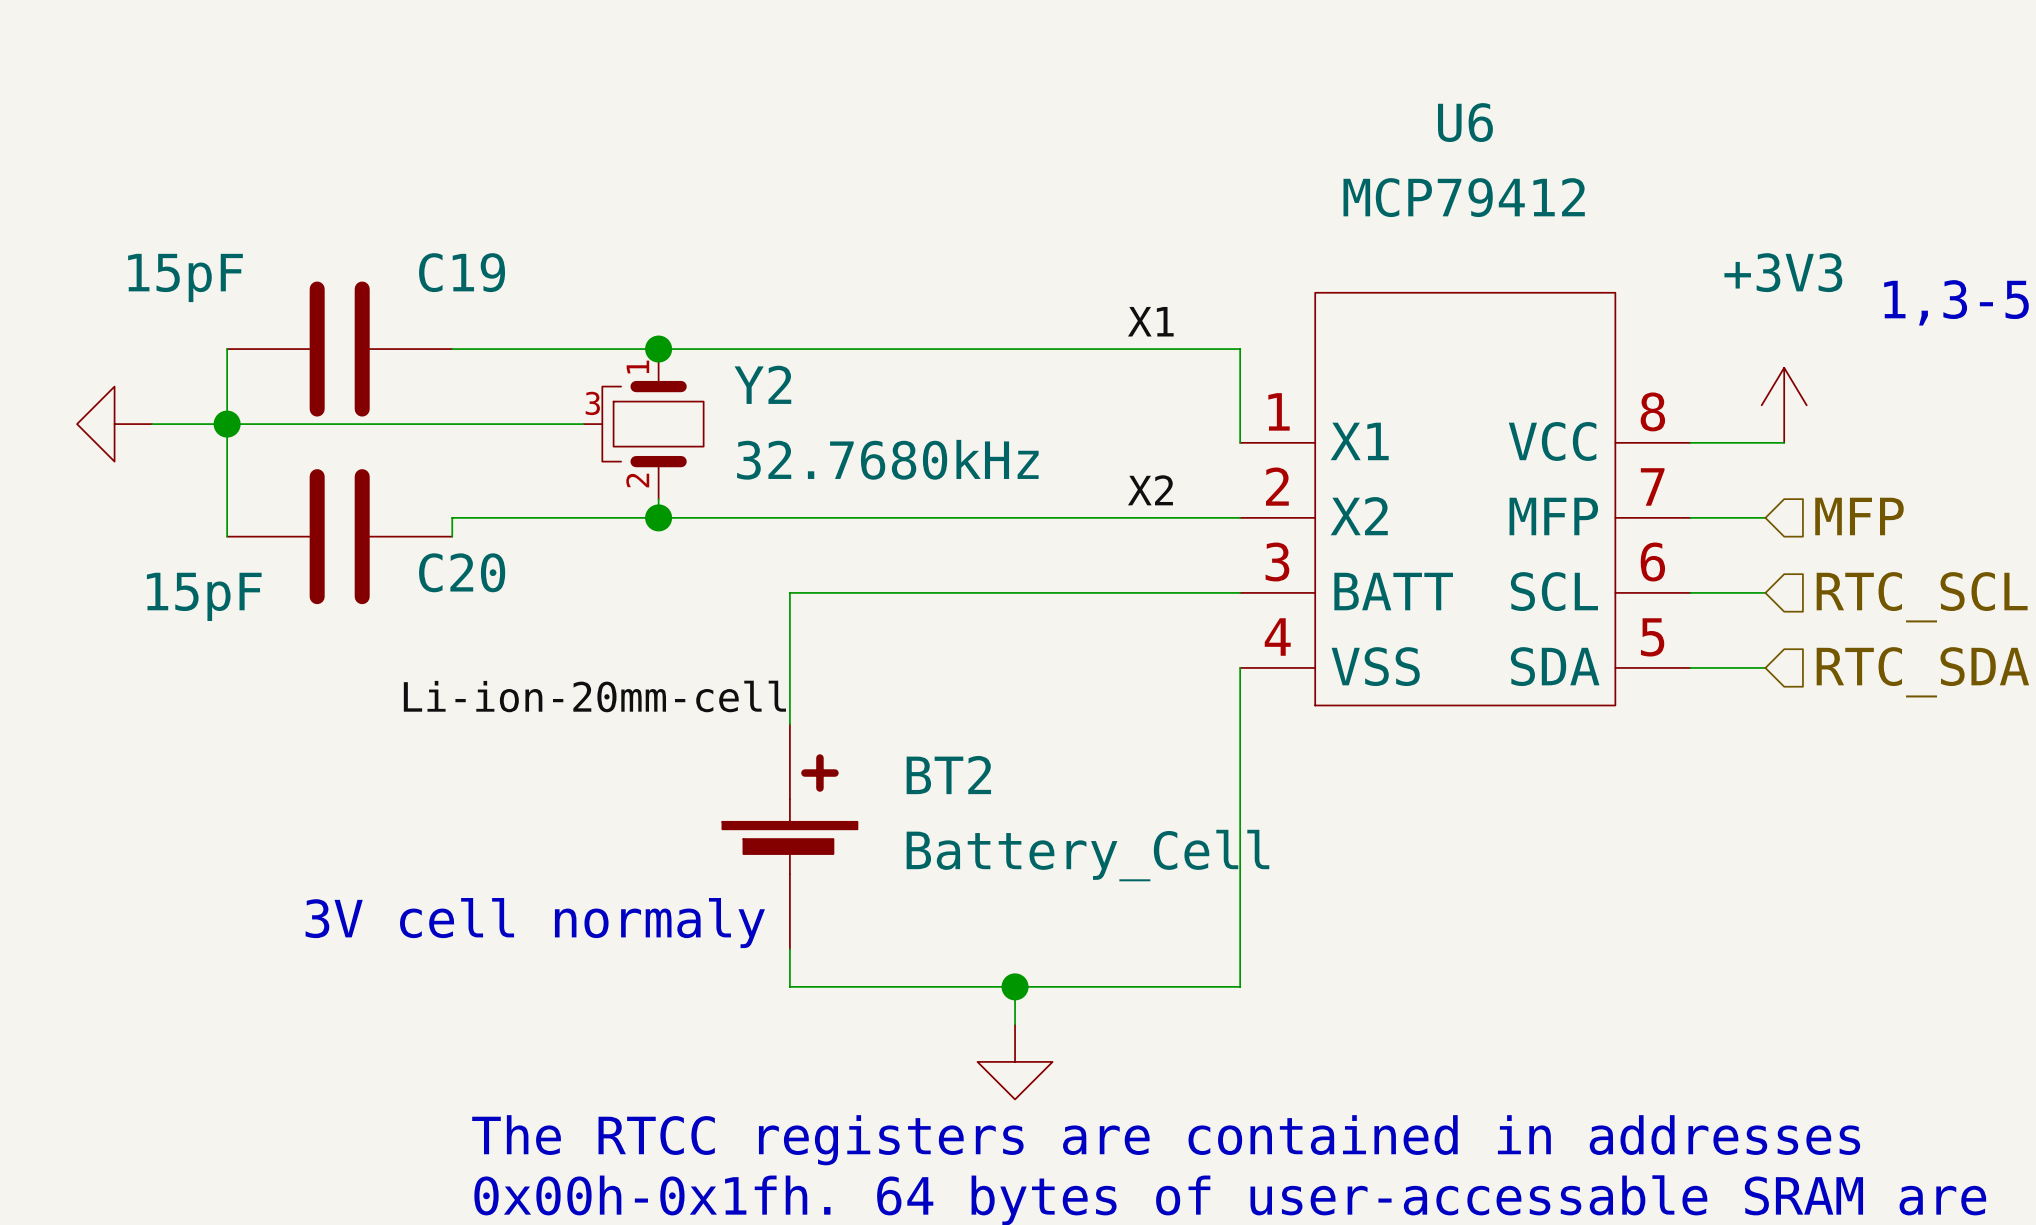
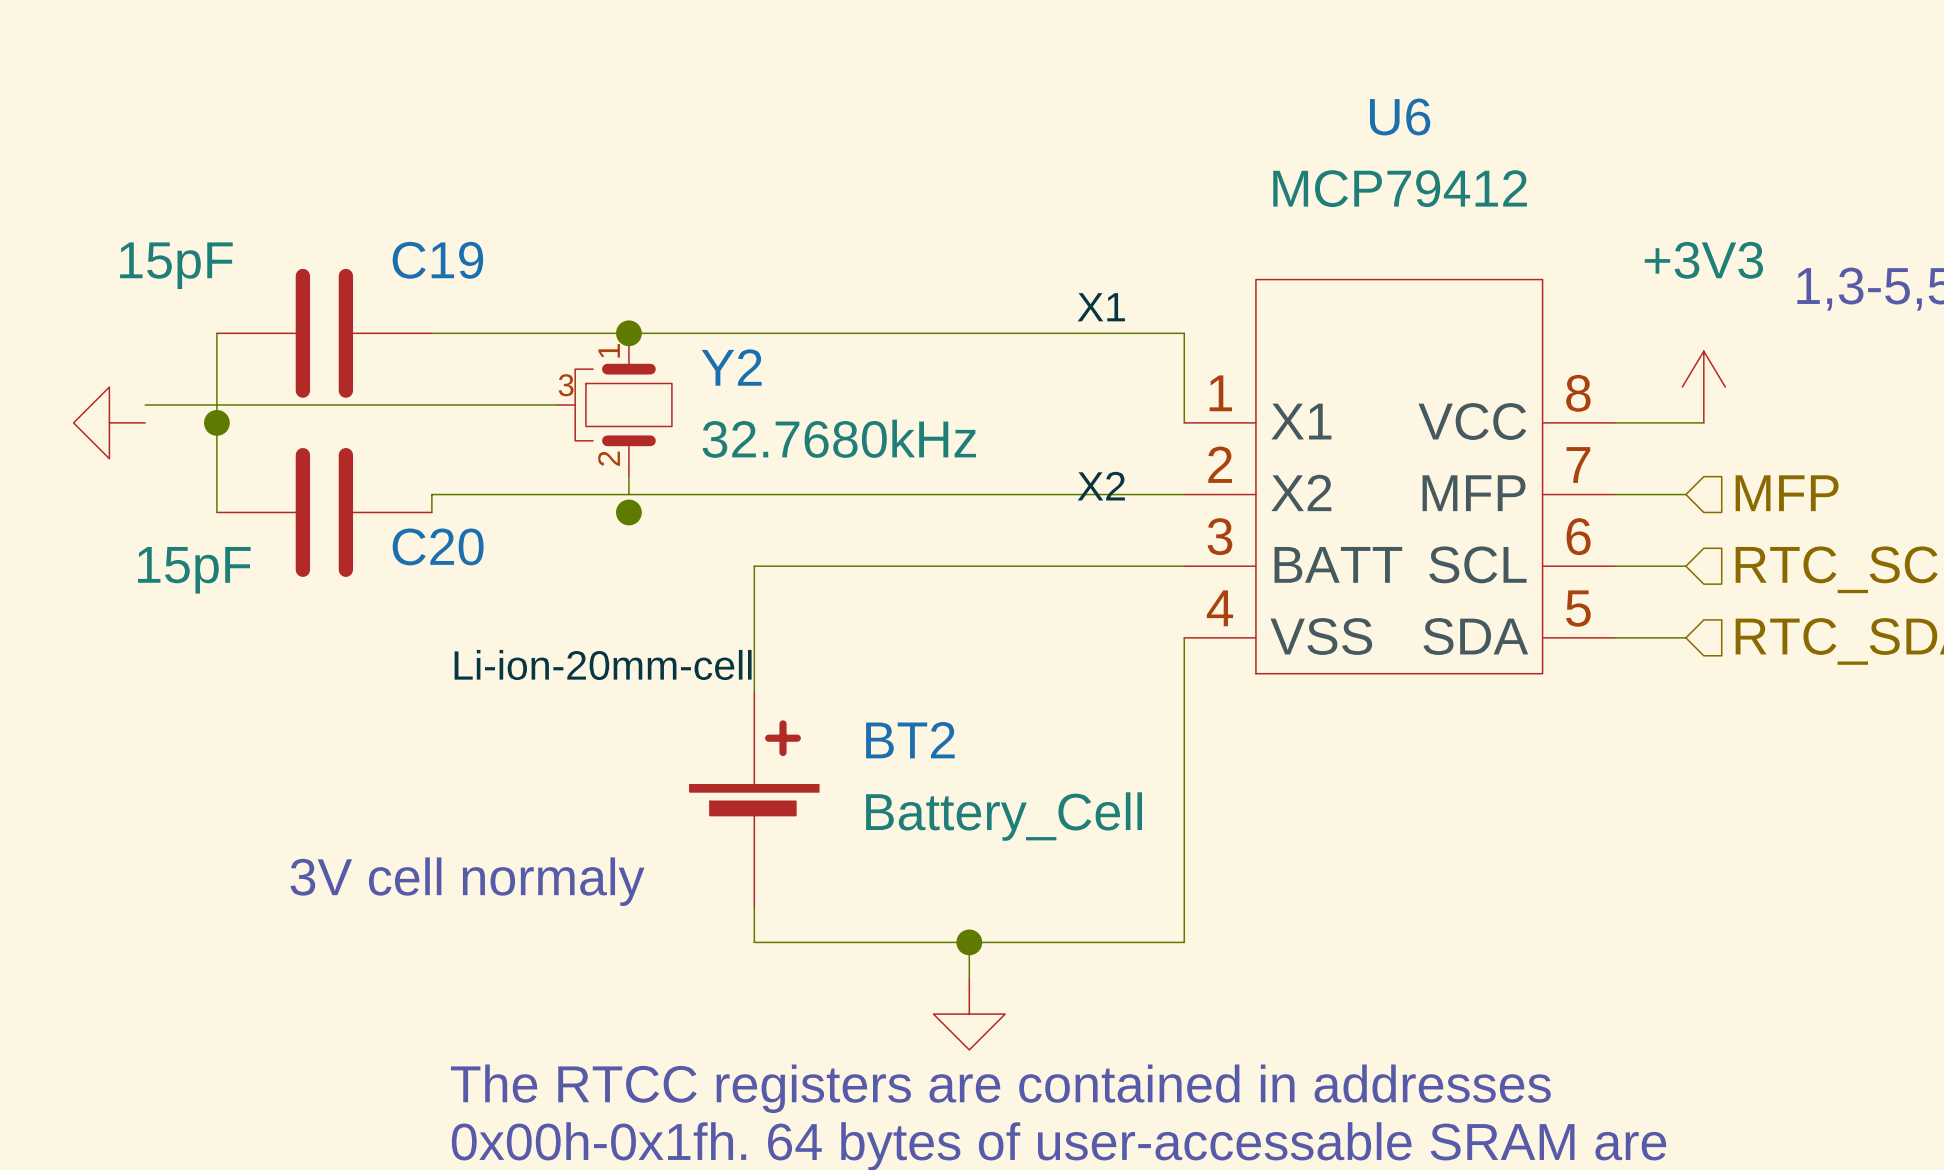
power symbol position: (114, 424) -> (109, 422)
junction position: (227, 424) -> (216, 422)
label position: X2 (1150, 490) -> X2 (1101, 486)
junction position: (658, 517) -> (628, 512)

